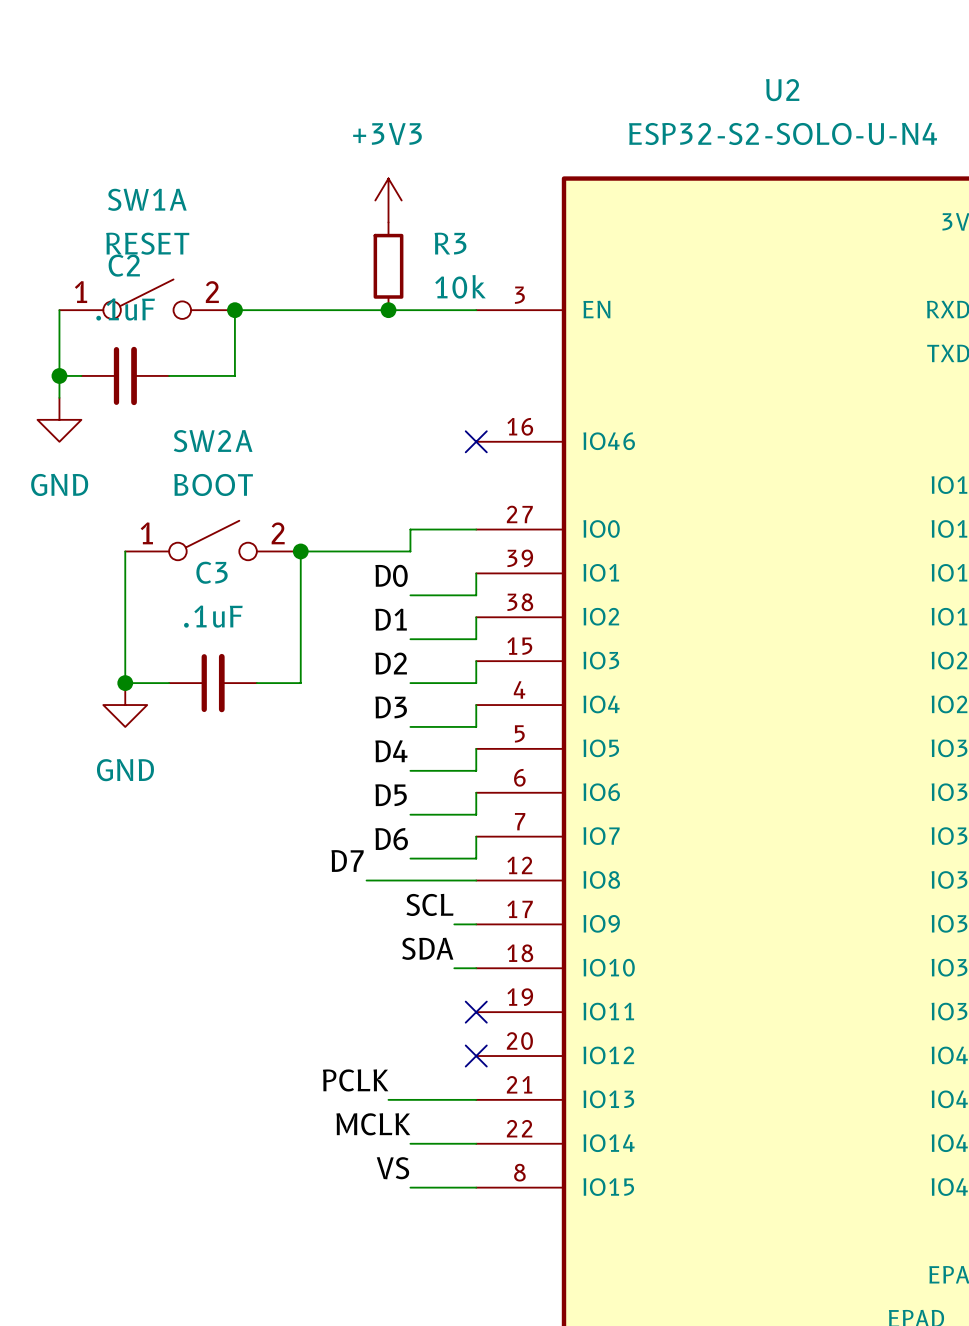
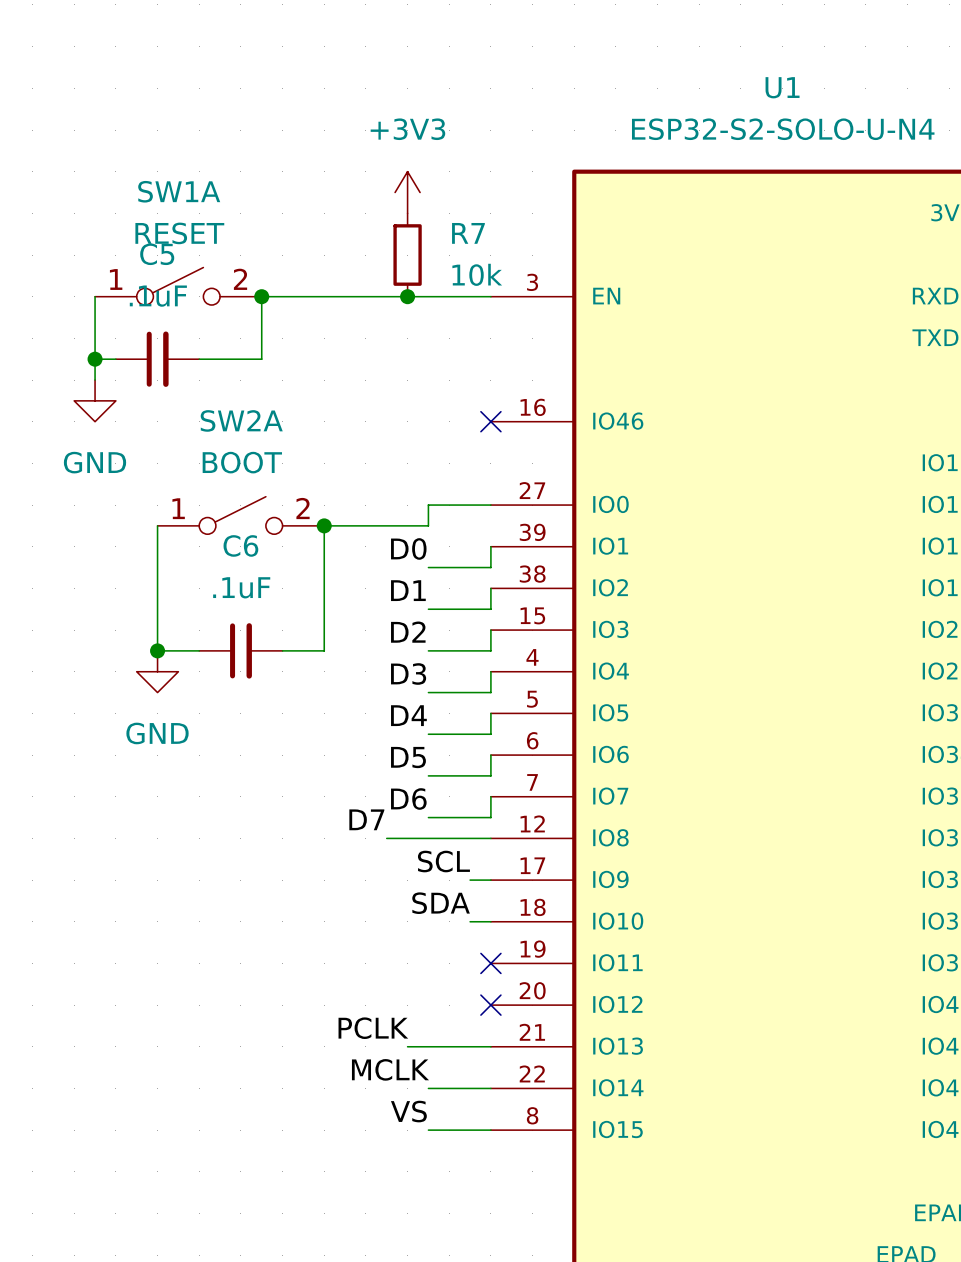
U2 name: U2 (782, 90) -> U1 (782, 87)
R3 name: R3 (450, 243) -> R7 (468, 233)
C2 name: C2 (124, 265) -> C5 (157, 254)
C3 name: C3 (212, 572) -> C6 (240, 545)

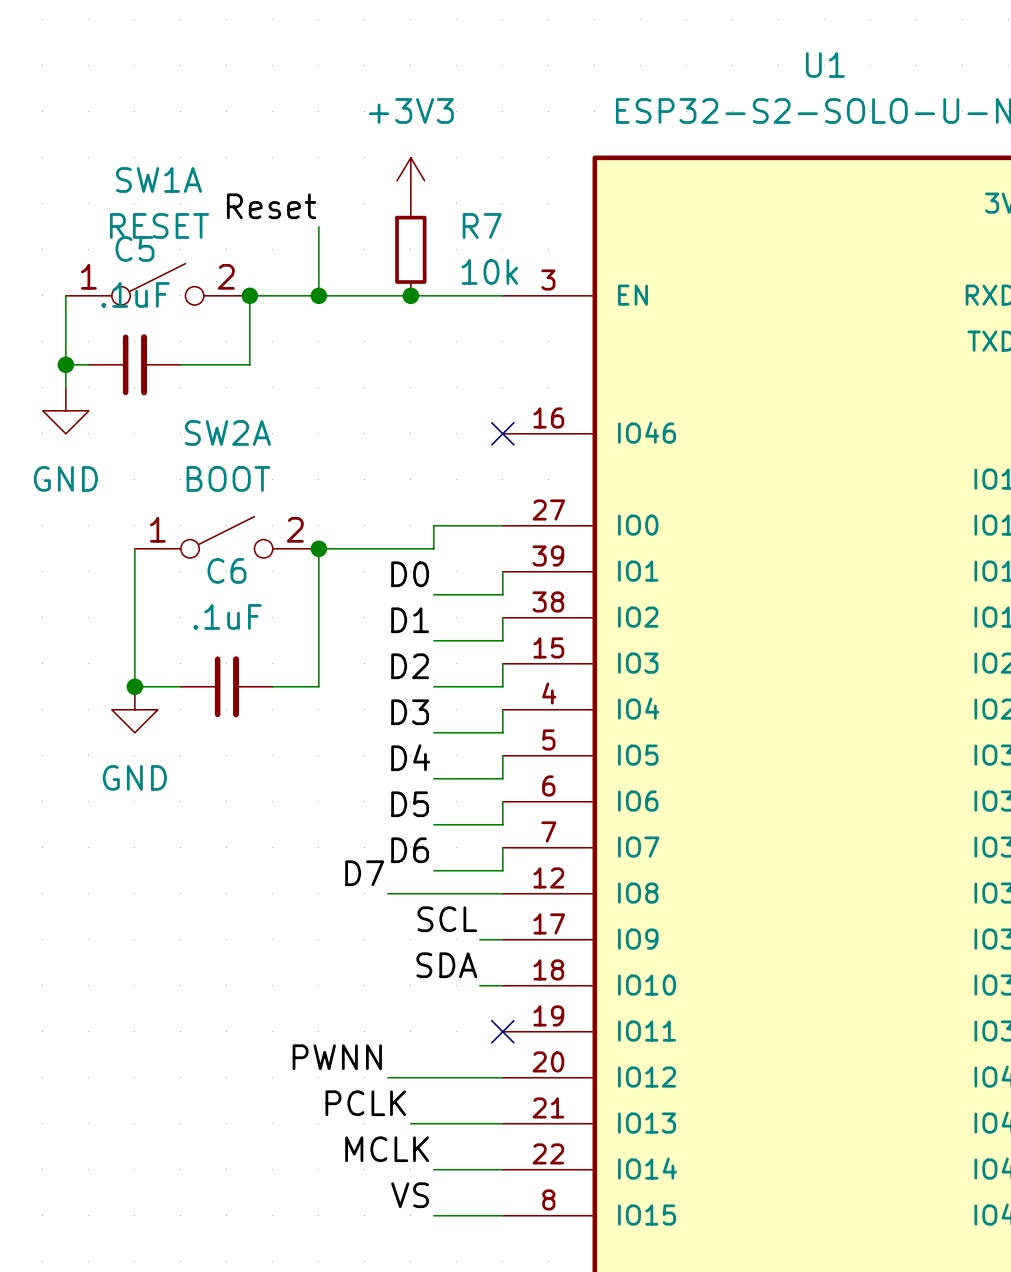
label: none -> Reset (271, 206)
wire: none -> (318, 226) (318, 295)
junction: none -> (318, 295)
label: none -> PWNN (337, 1057)
wire: none -> (387, 1077) (502, 1077)
no-connect mark: (490, 1005) -> none

